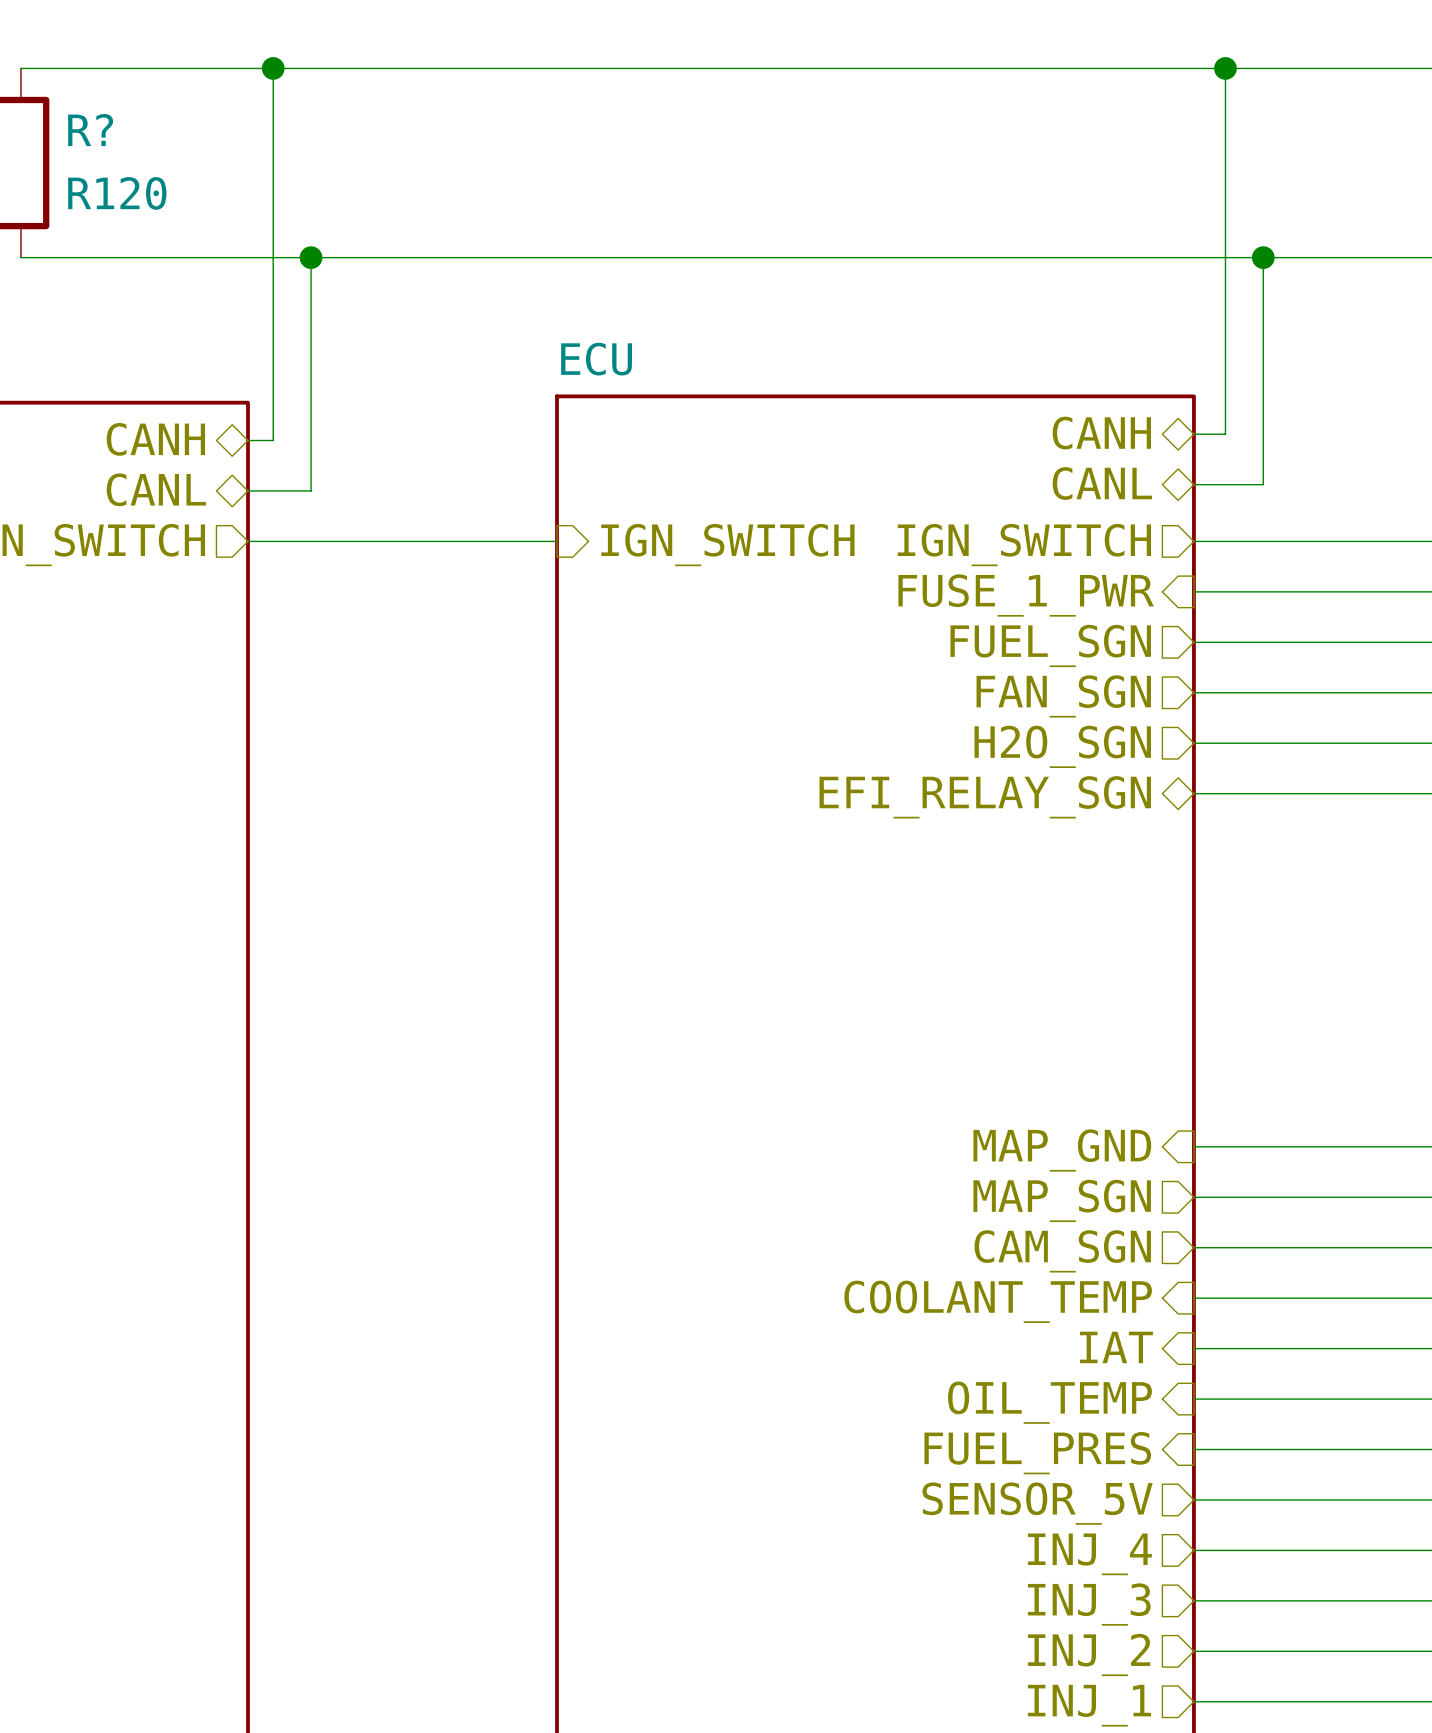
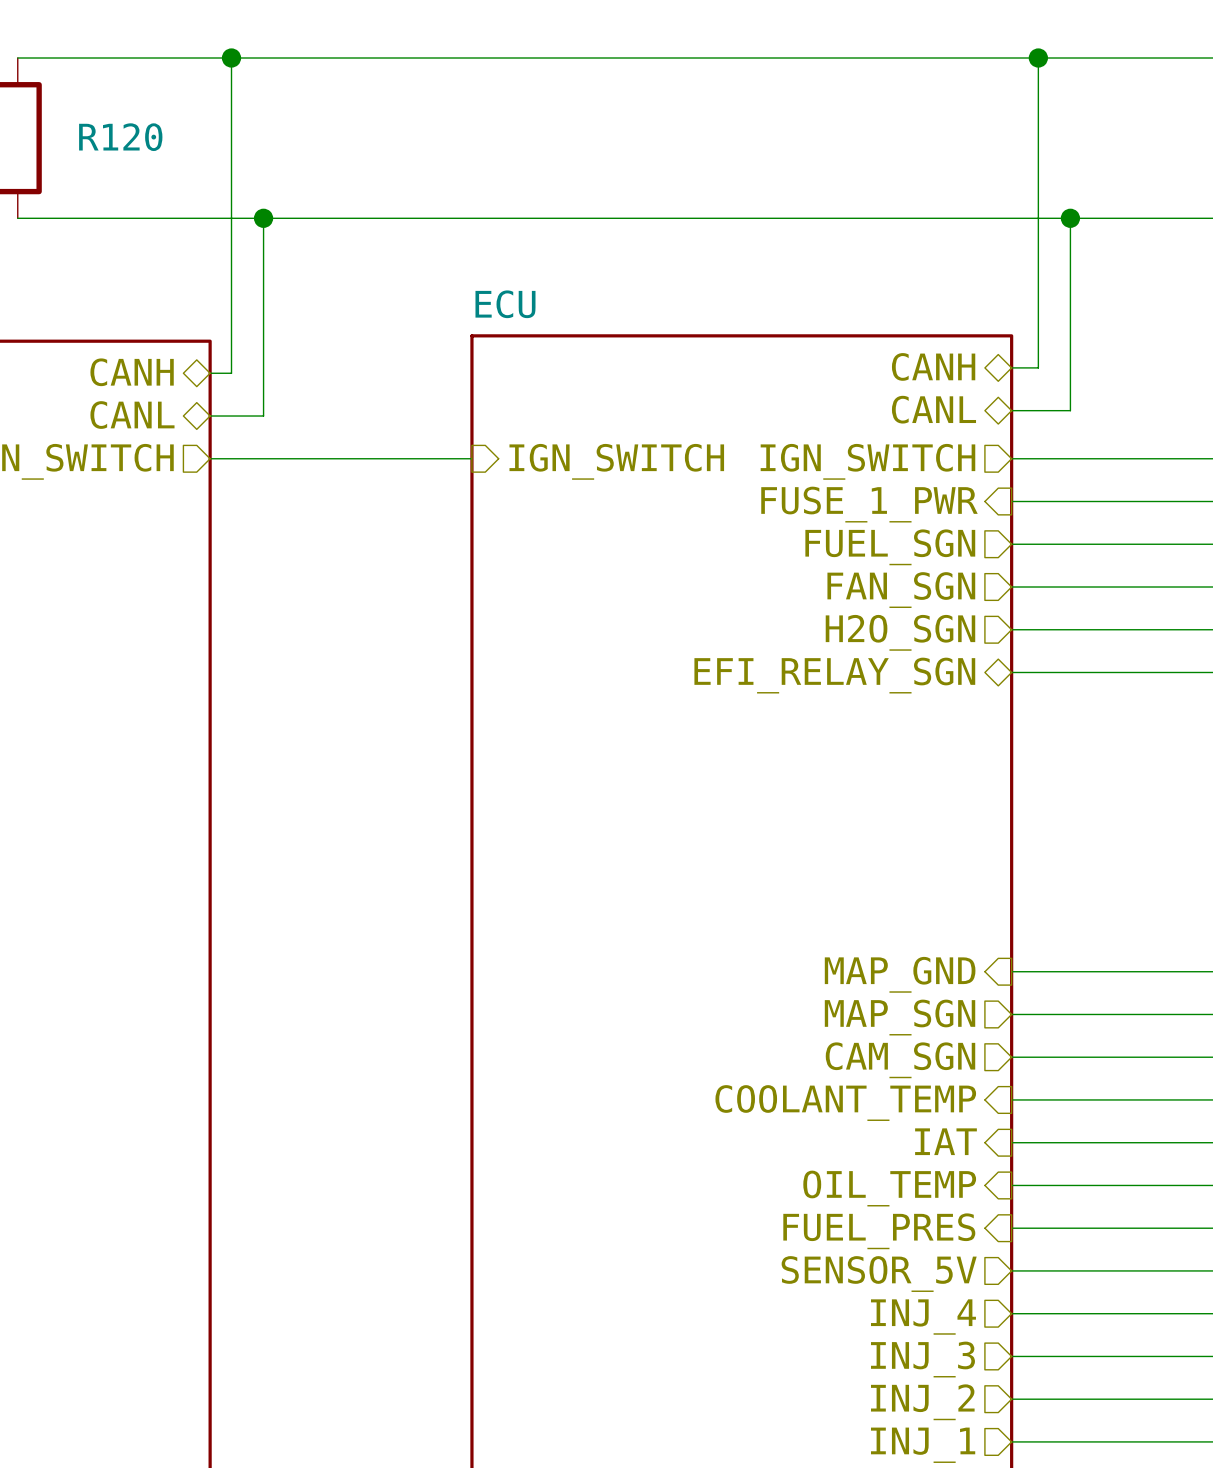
R? name: R? (90, 130) -> none
R? value position: R120 (117, 193) -> R120 (120, 137)

